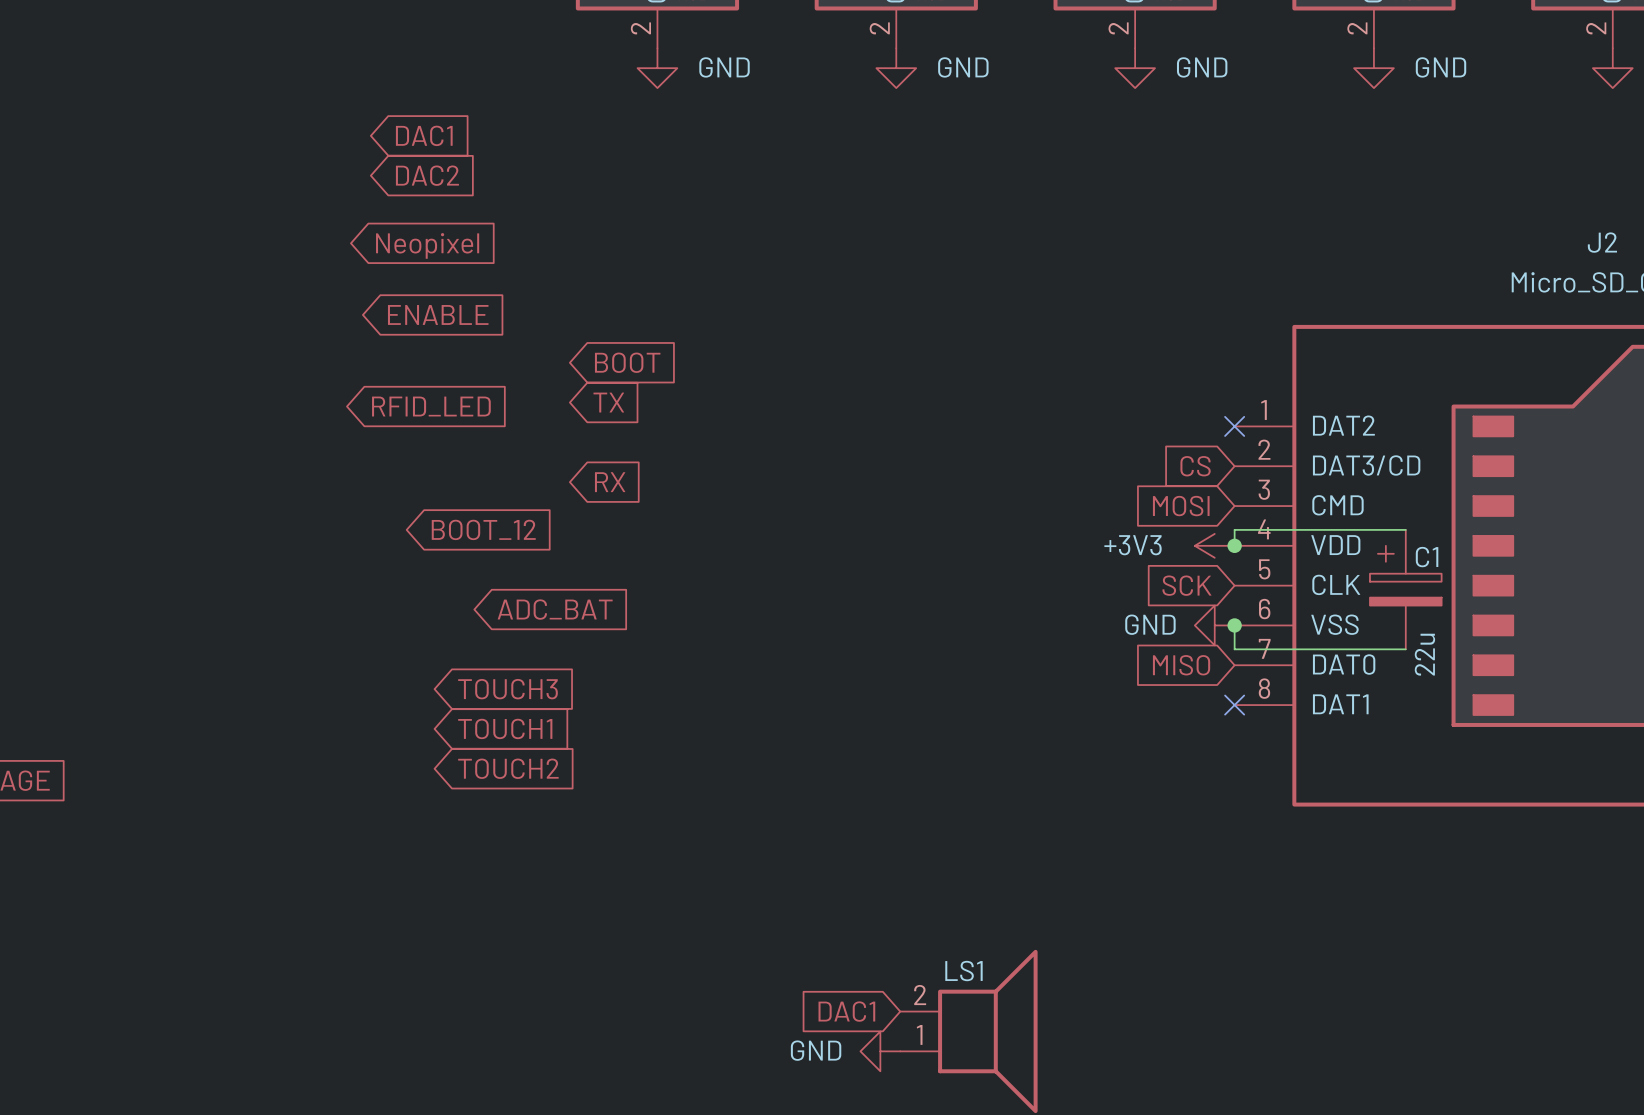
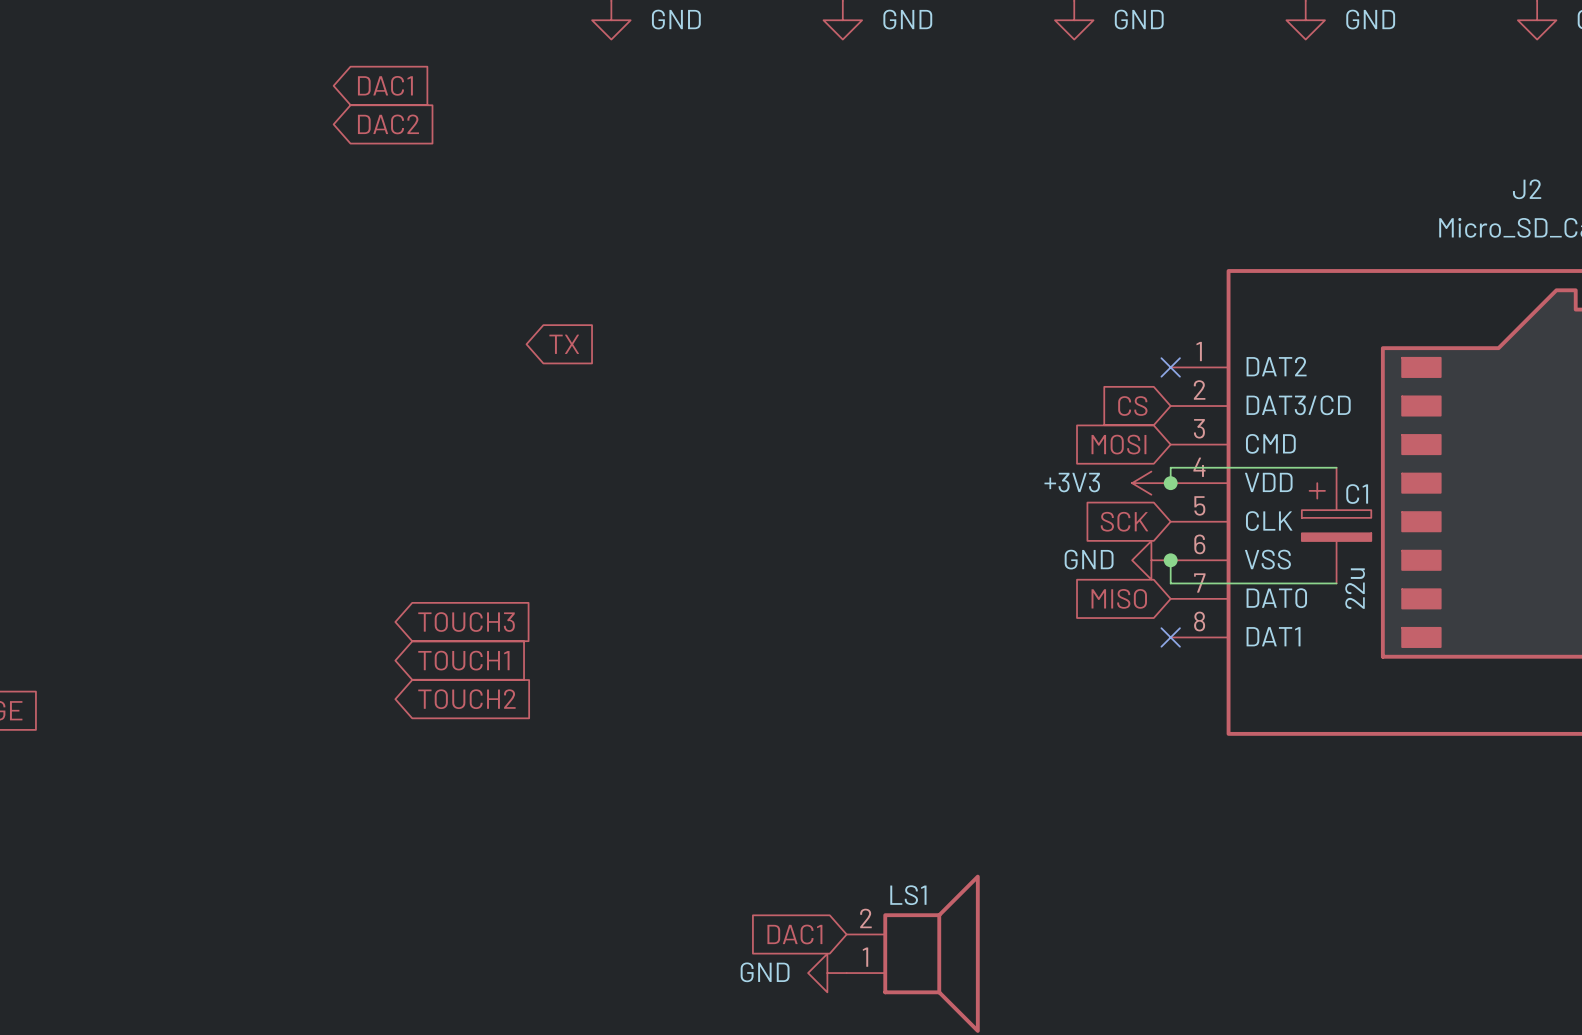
global label: Neopixel (427, 245) -> none
global label: ENABLE (438, 314) -> none
global label: BOOT (627, 362) -> none
global label: RFID_LED (431, 406) -> none
global label: RX (610, 482) -> none
global label: BOOT_12 (483, 529) -> none
global label: ADC_BAT (555, 609) -> none

